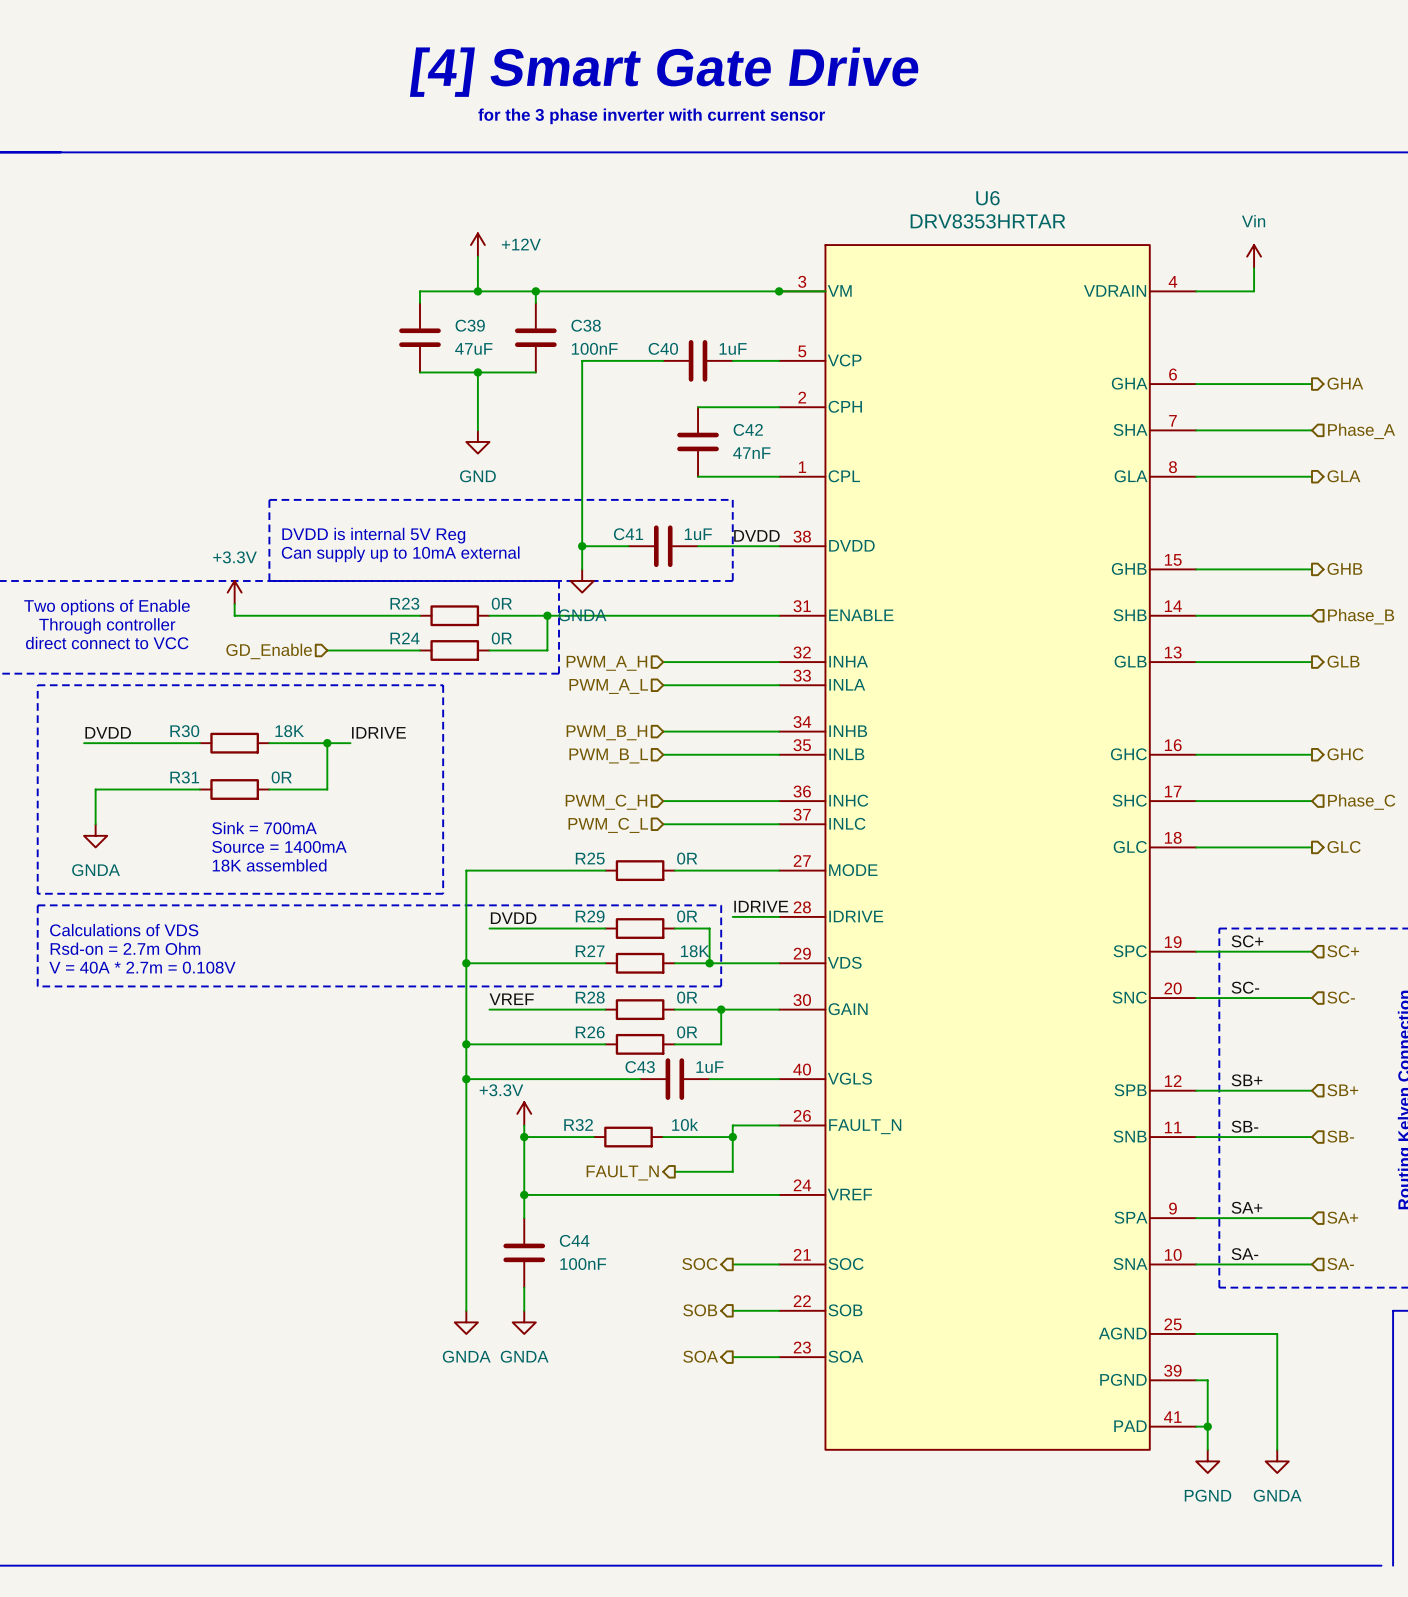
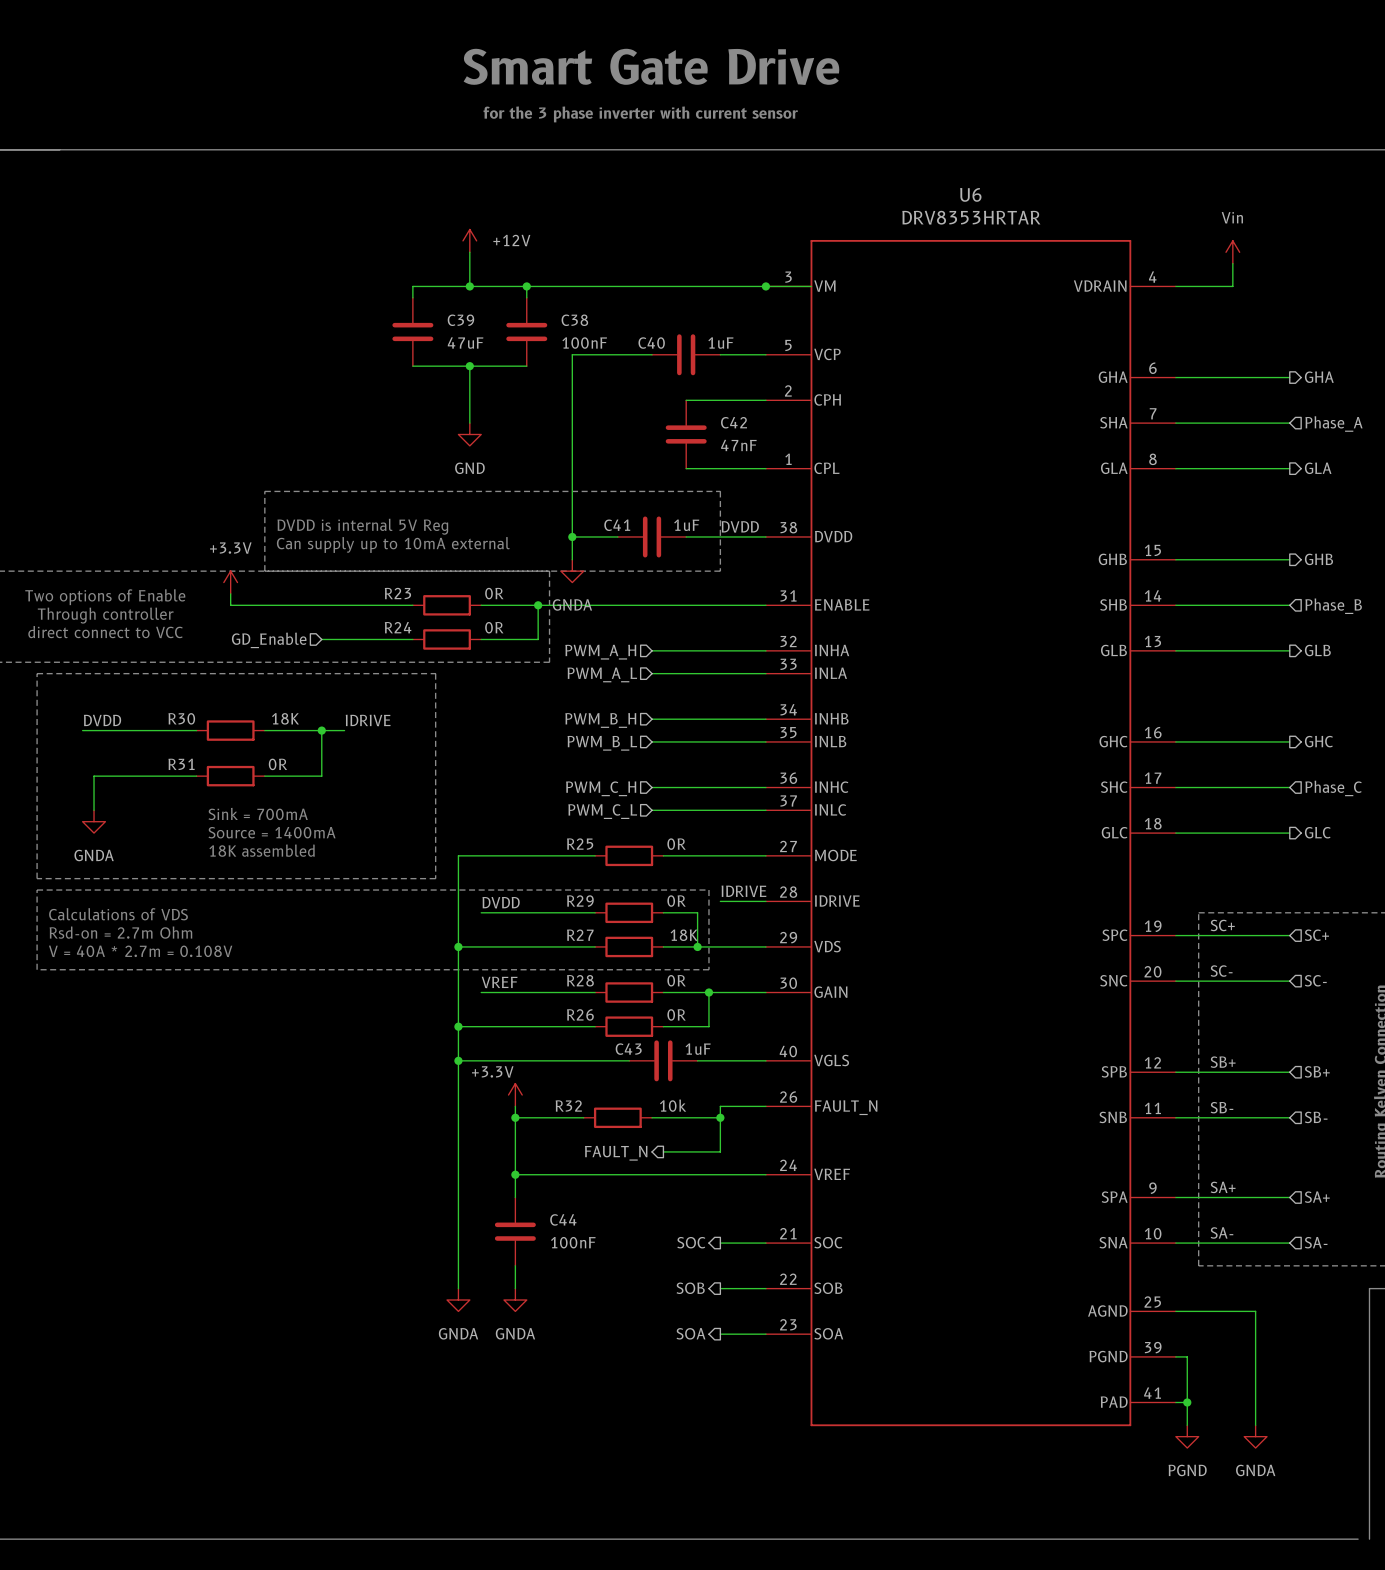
text: [4] Smart Gate Drive (664, 72) -> Smart Gate Drive (651, 66)
U6 symbol: [779, 245, 1197, 1450] -> [765, 239, 1176, 1427]

